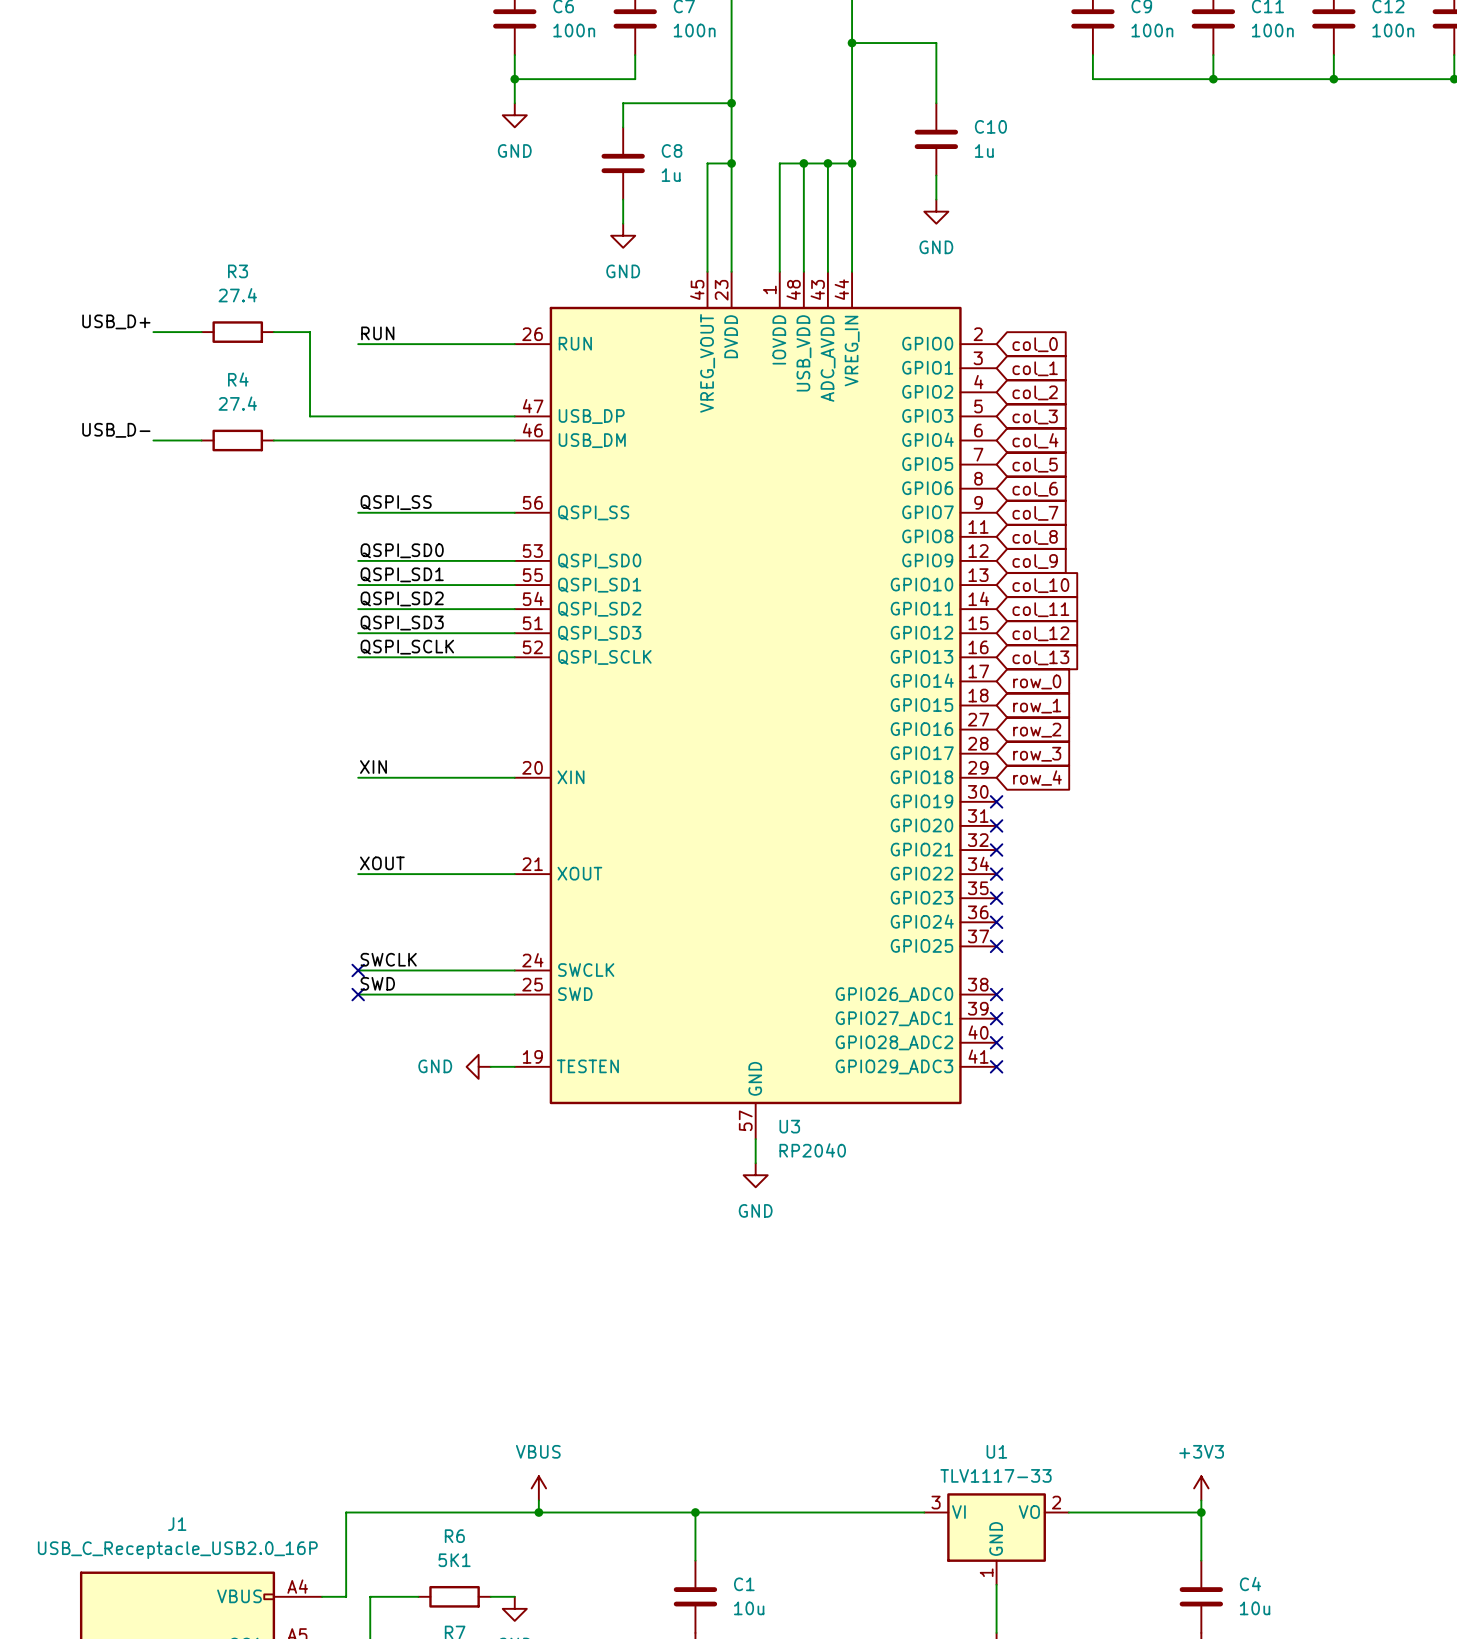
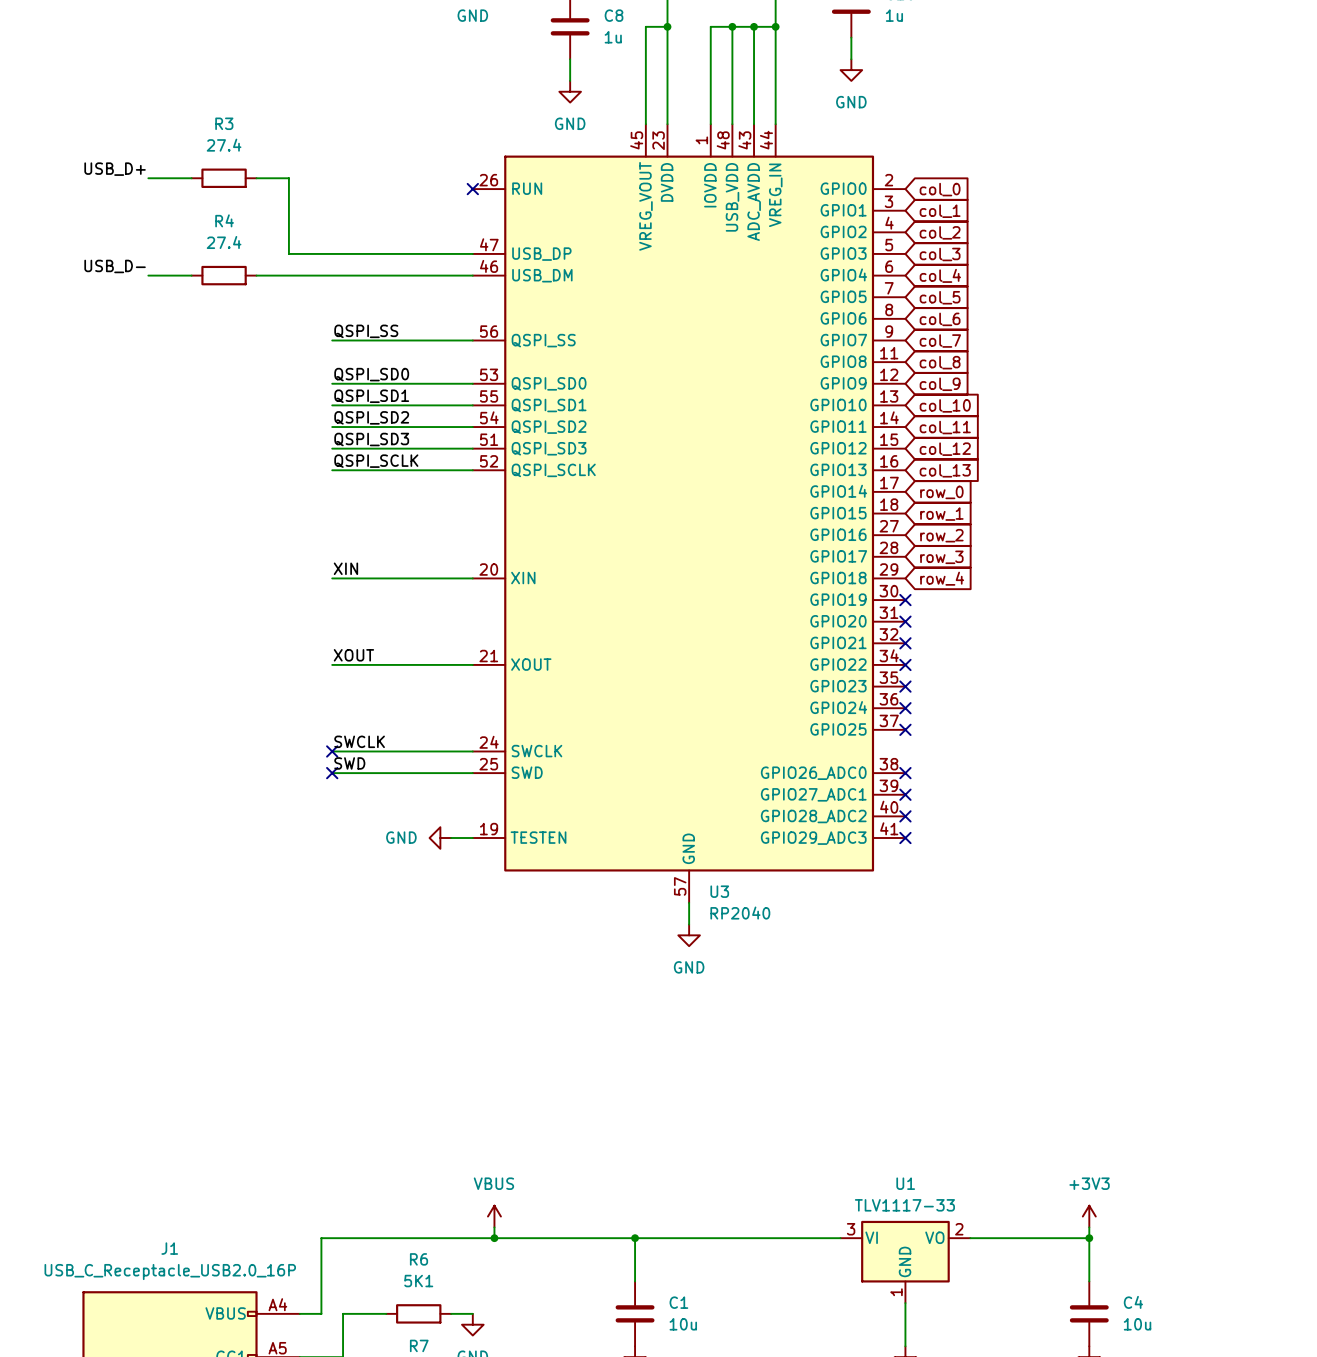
label: RUN (377, 333) -> none
wire: (358, 344) (514, 344) -> none
no-connect mark: none -> (472, 189)

